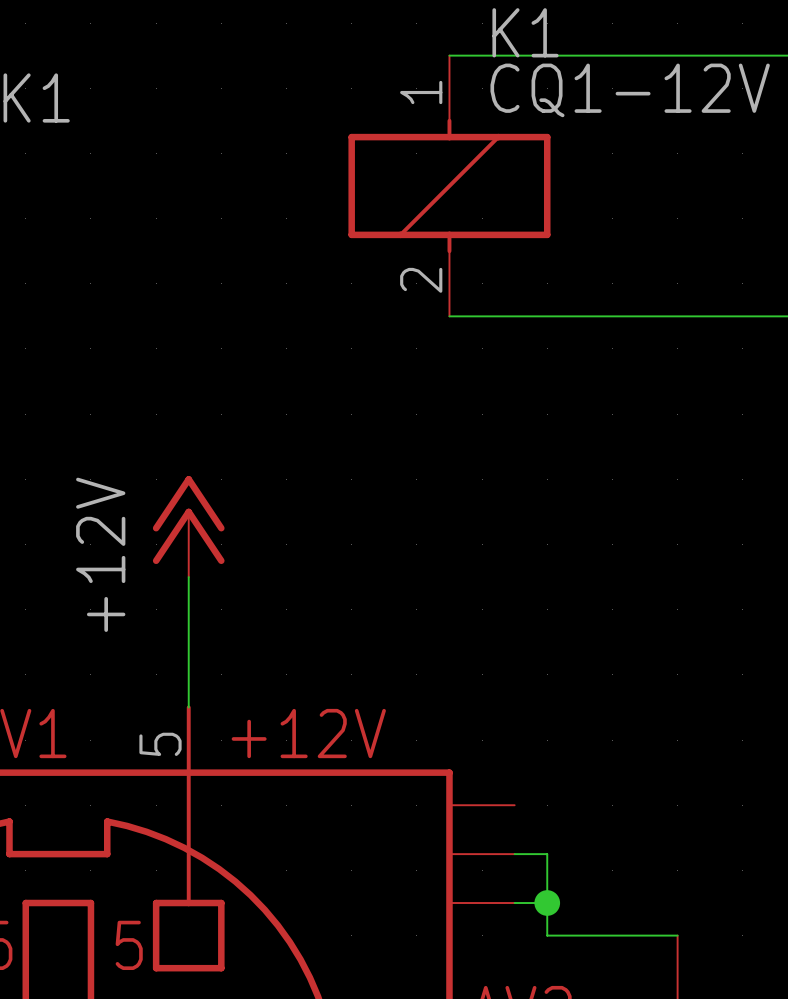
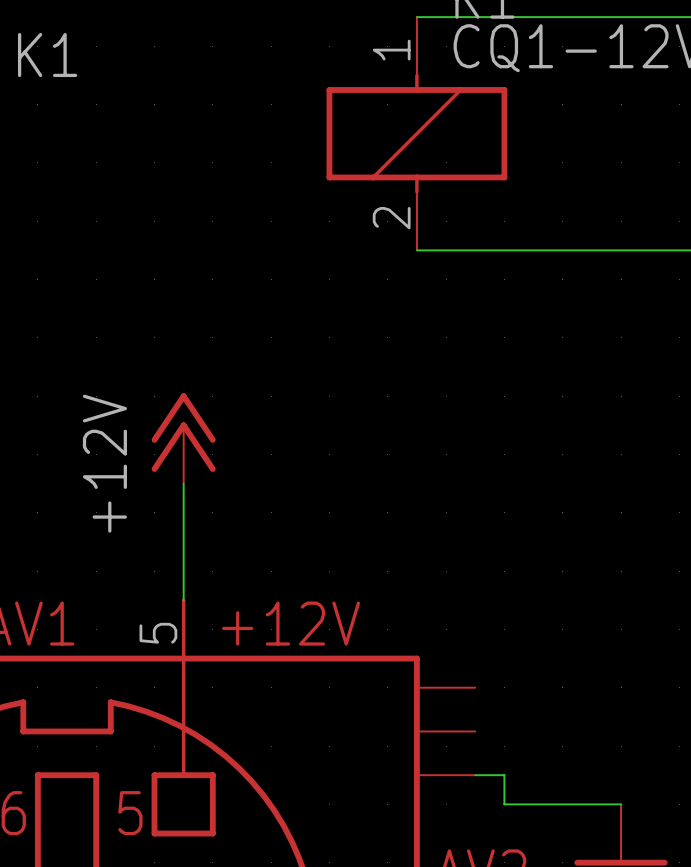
wire: (514, 854) (547, 854) (547, 903) -> none
junction: (547, 903) -> none

